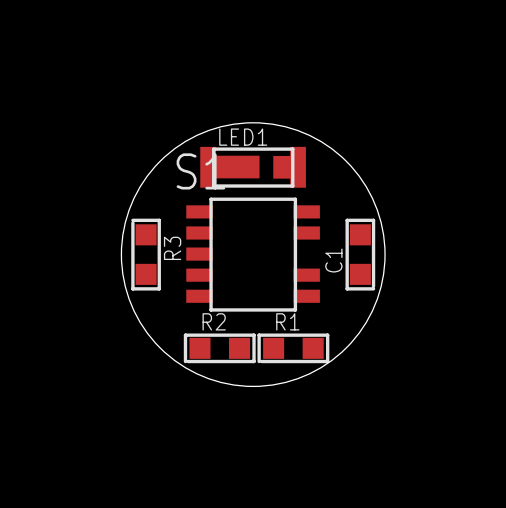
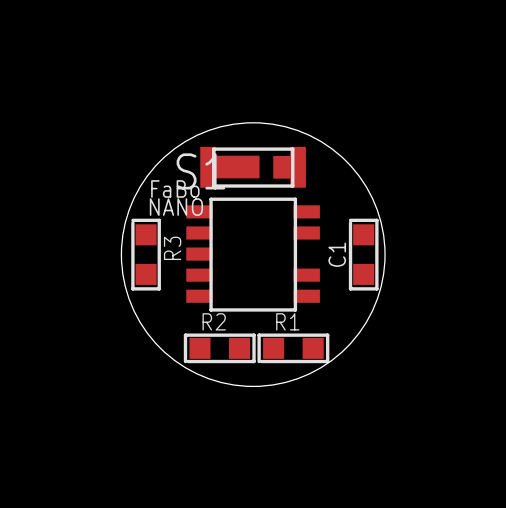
LED1 name: LED1 (243, 137) -> none
text: none -> FaBo (175, 188)
text: none -> NANO (176, 207)
C1 rotation: 0° (360, 254) -> 180° (363, 254)

